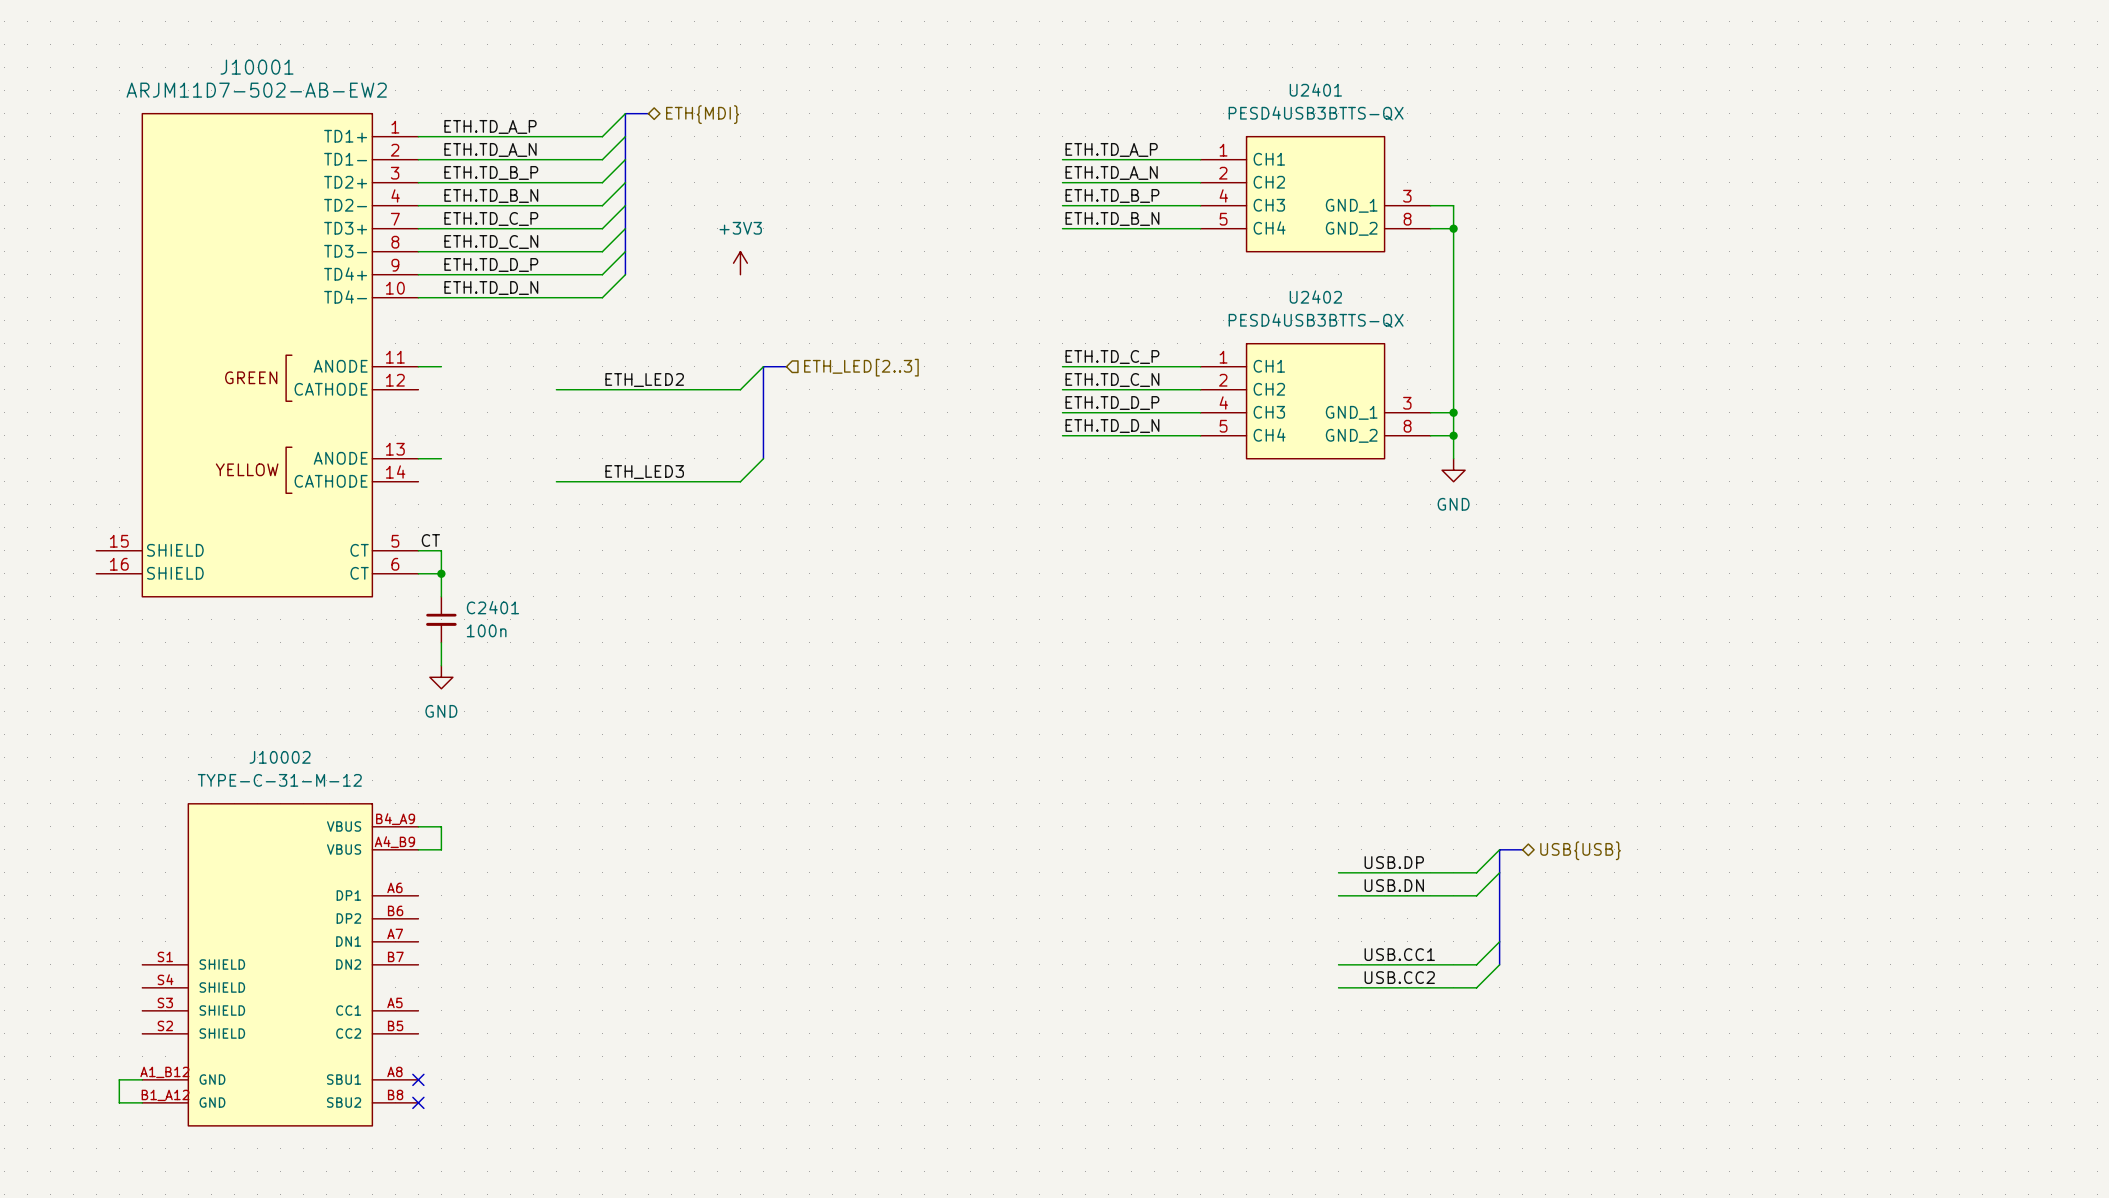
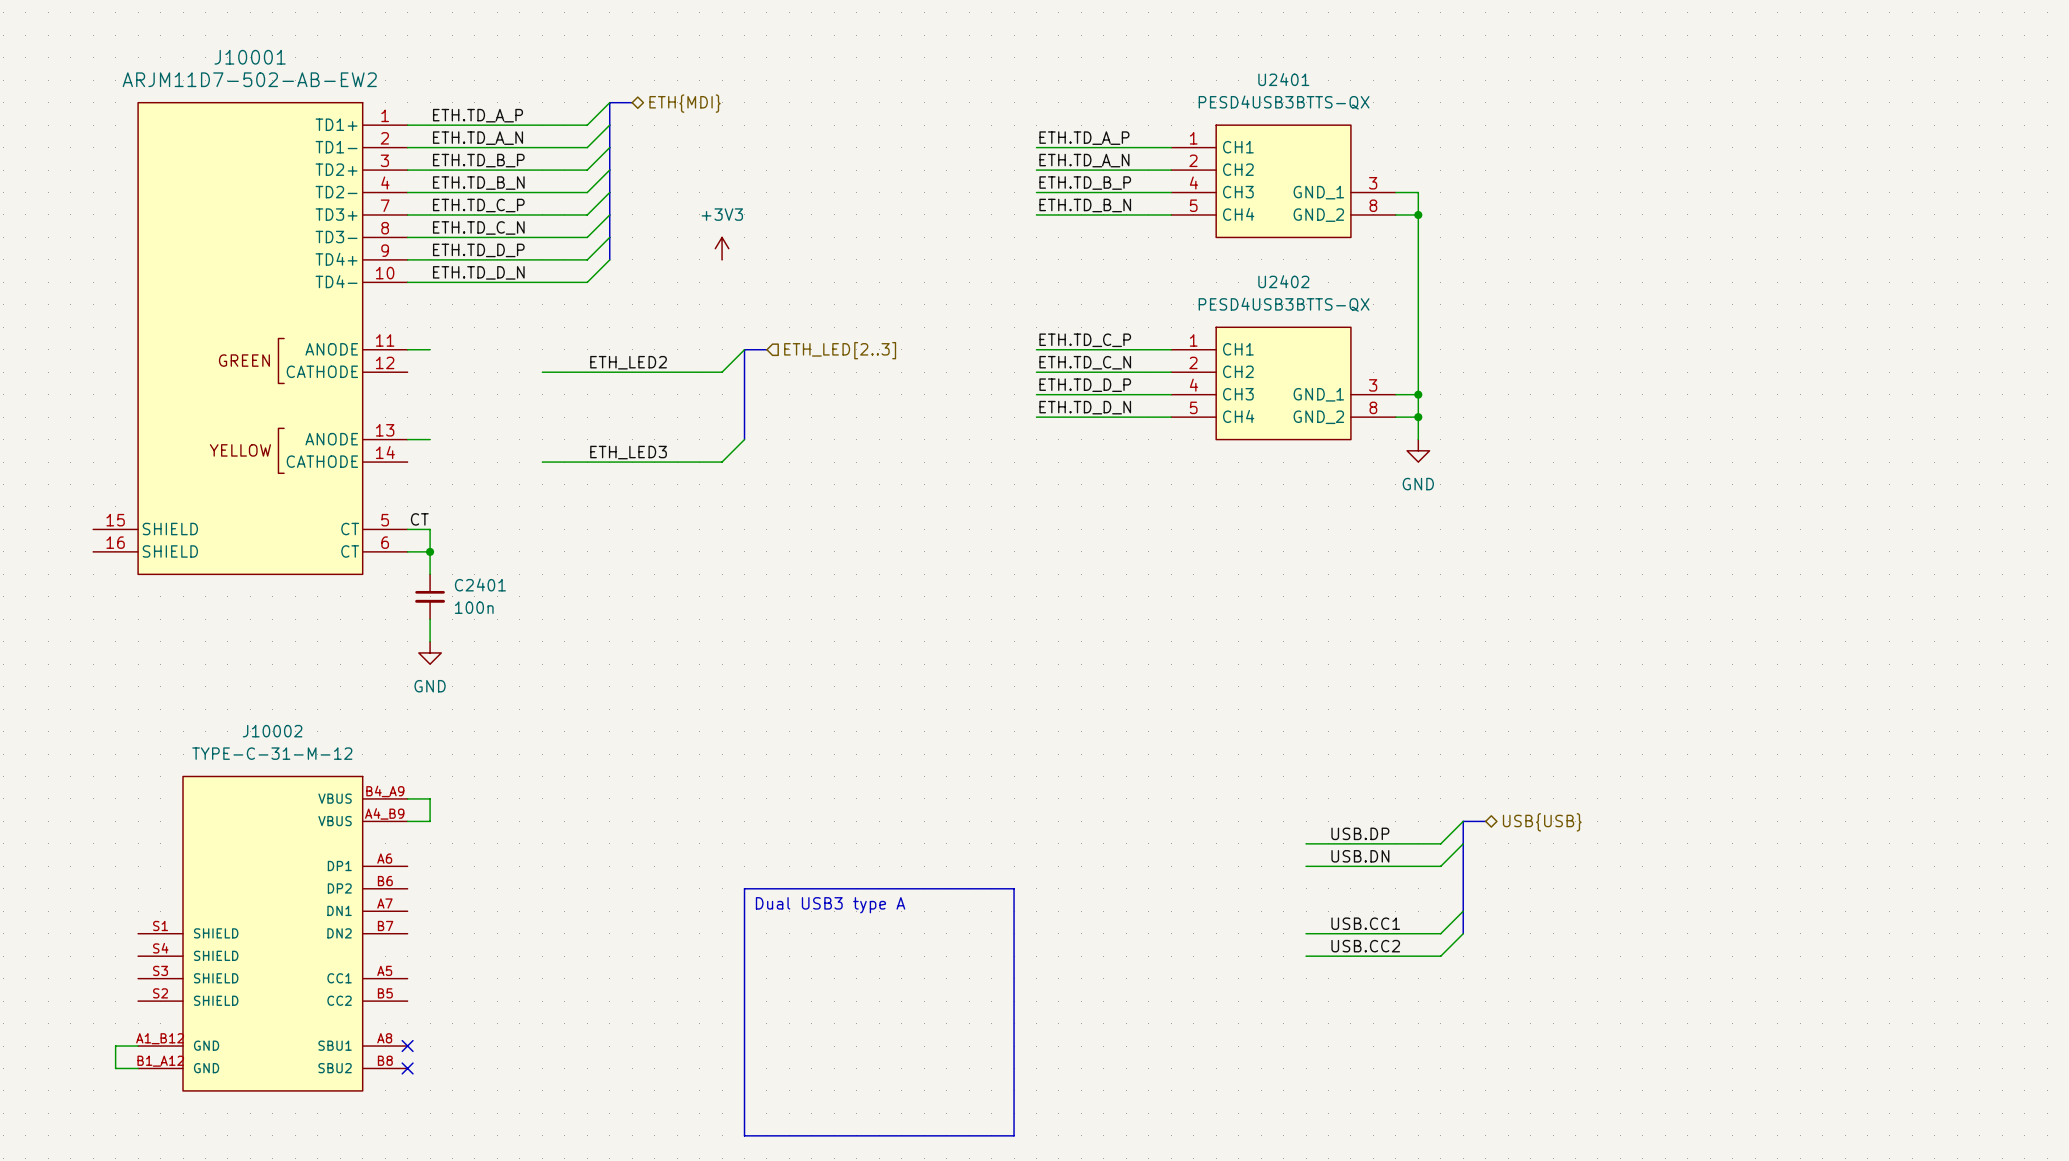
line: none -> (744, 888) (1014, 888) (1014, 1135) (744, 1135) (744, 888)
text: none -> Dual USB3 type A (830, 905)

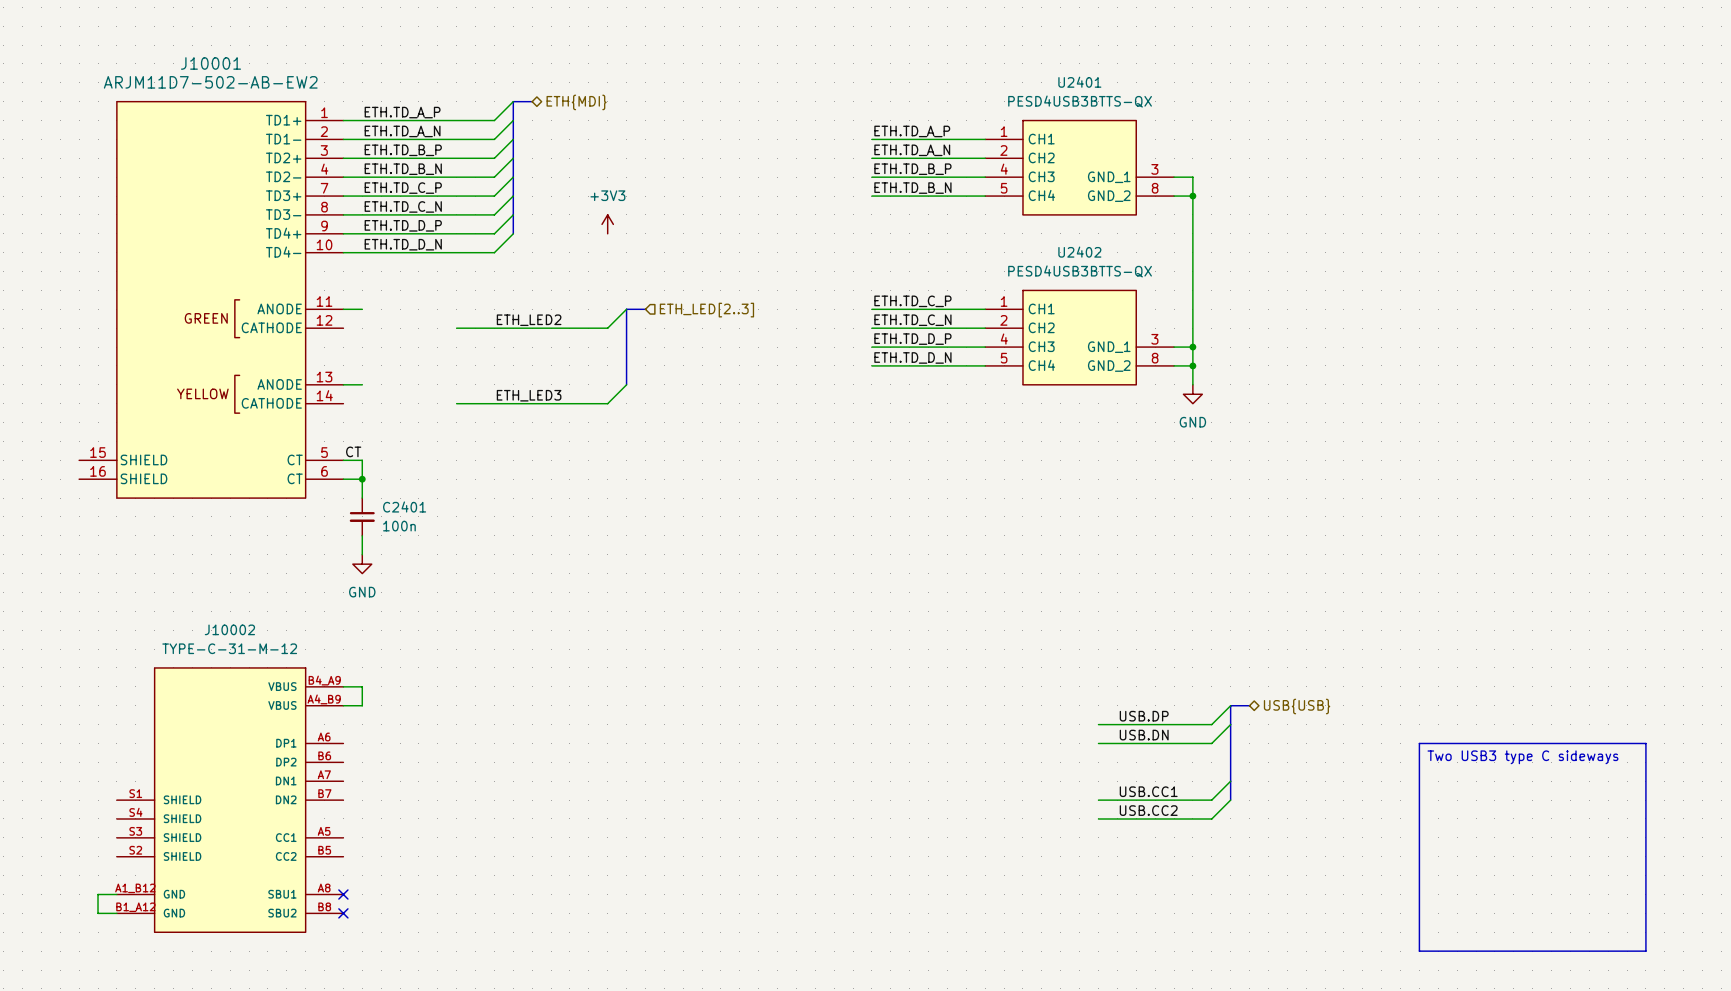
line: none -> (1419, 743) (1645, 743) (1645, 951) (1419, 951) (1419, 743)
text: none -> Two USB3 type C sideways (1522, 757)
line: (744, 888) (1014, 888) (1014, 1135) (744, 1135) (744, 888) -> none
text: Dual USB3 type A (830, 905) -> none

